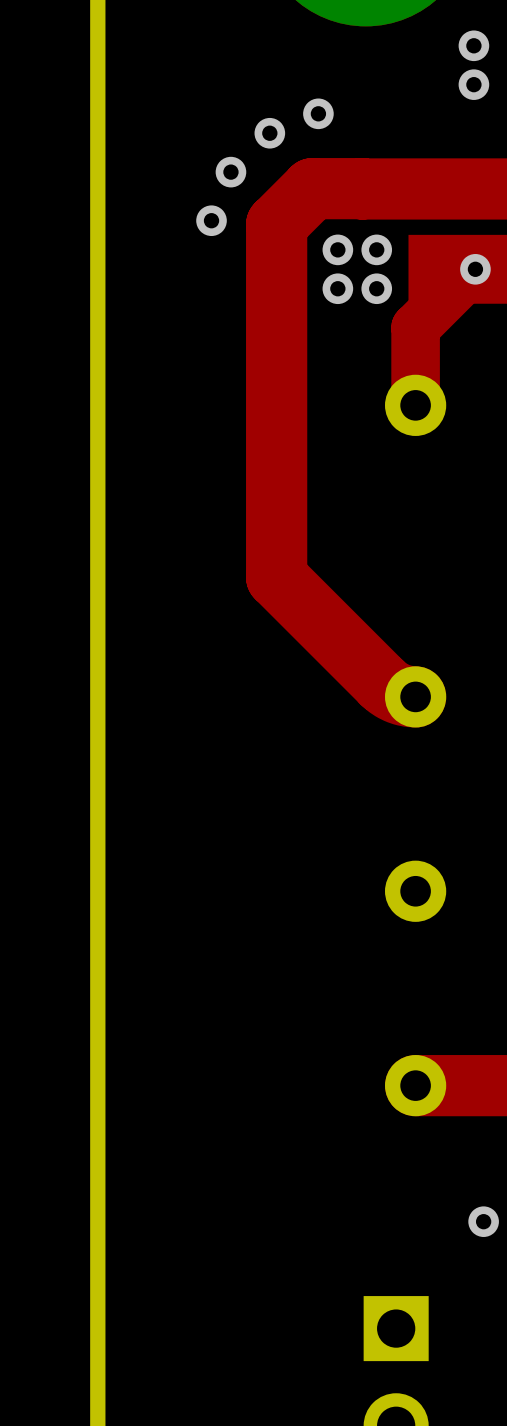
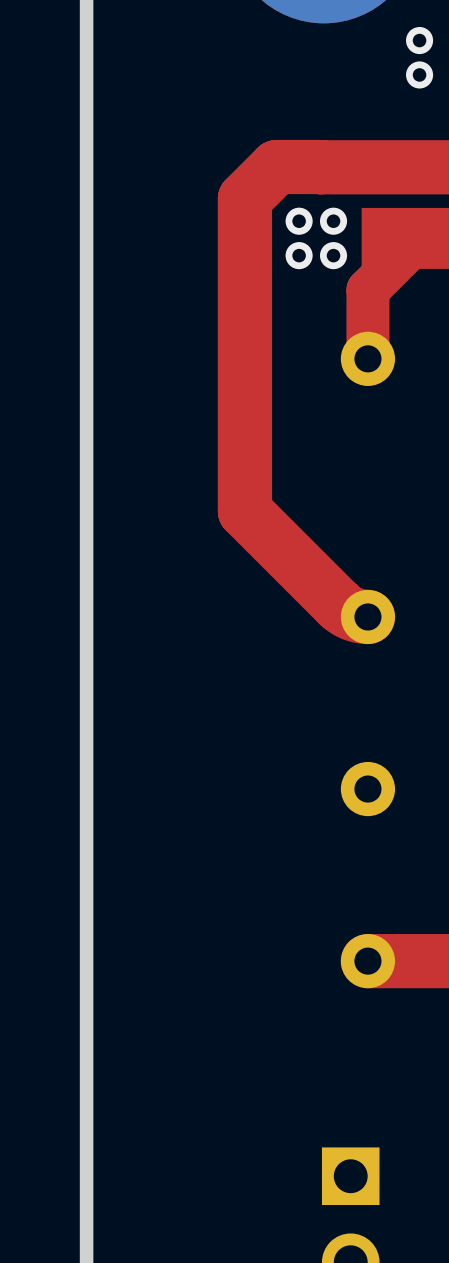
via: (318, 113) -> none
via: (269, 133) -> none
via: (230, 172) -> none
via: (211, 220) -> none
via: (475, 269) -> none
via: (483, 1221) -> none

